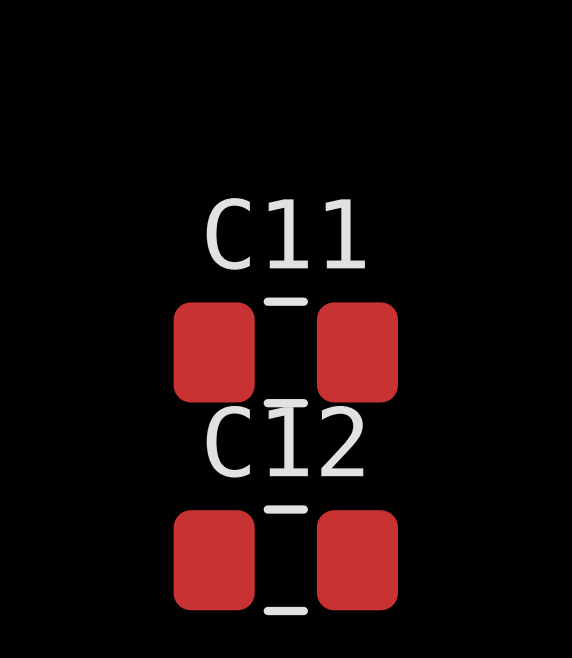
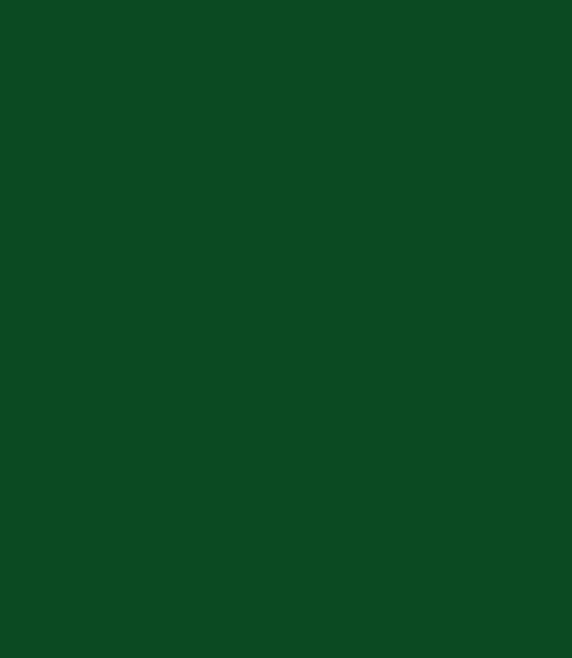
C11: (285, 352) -> none
C12: (285, 560) -> none

